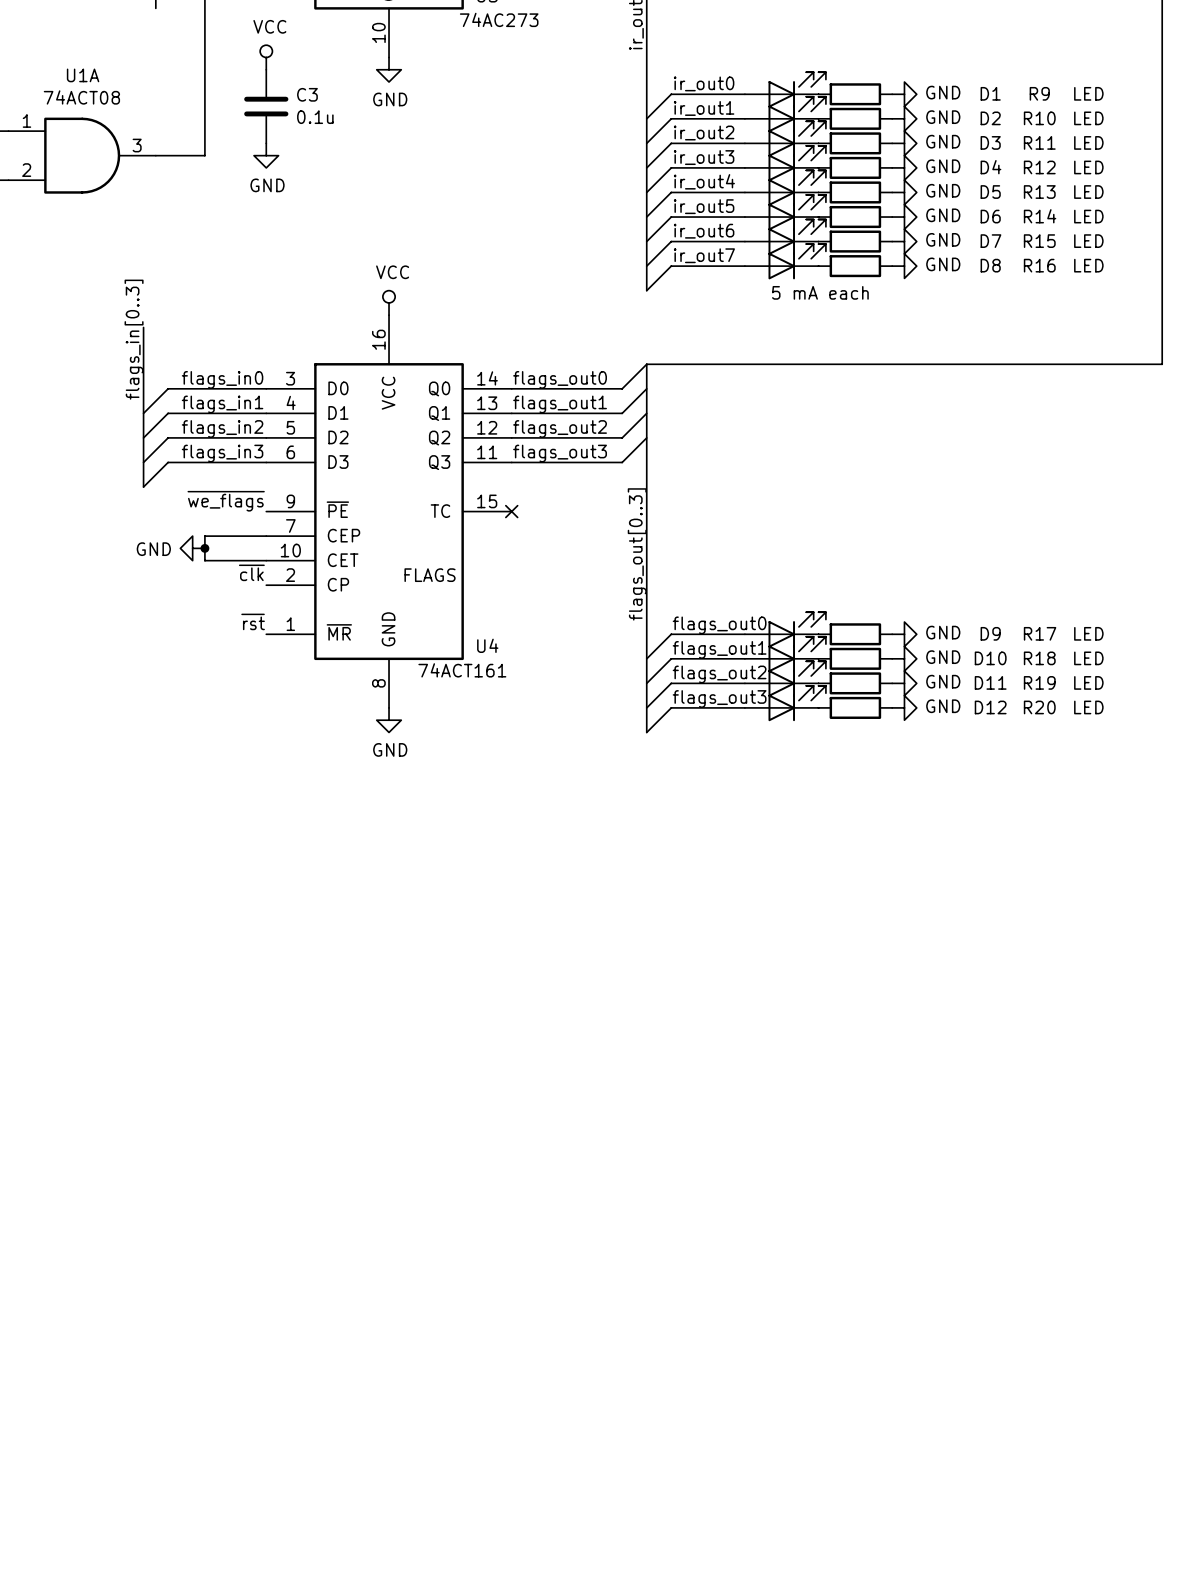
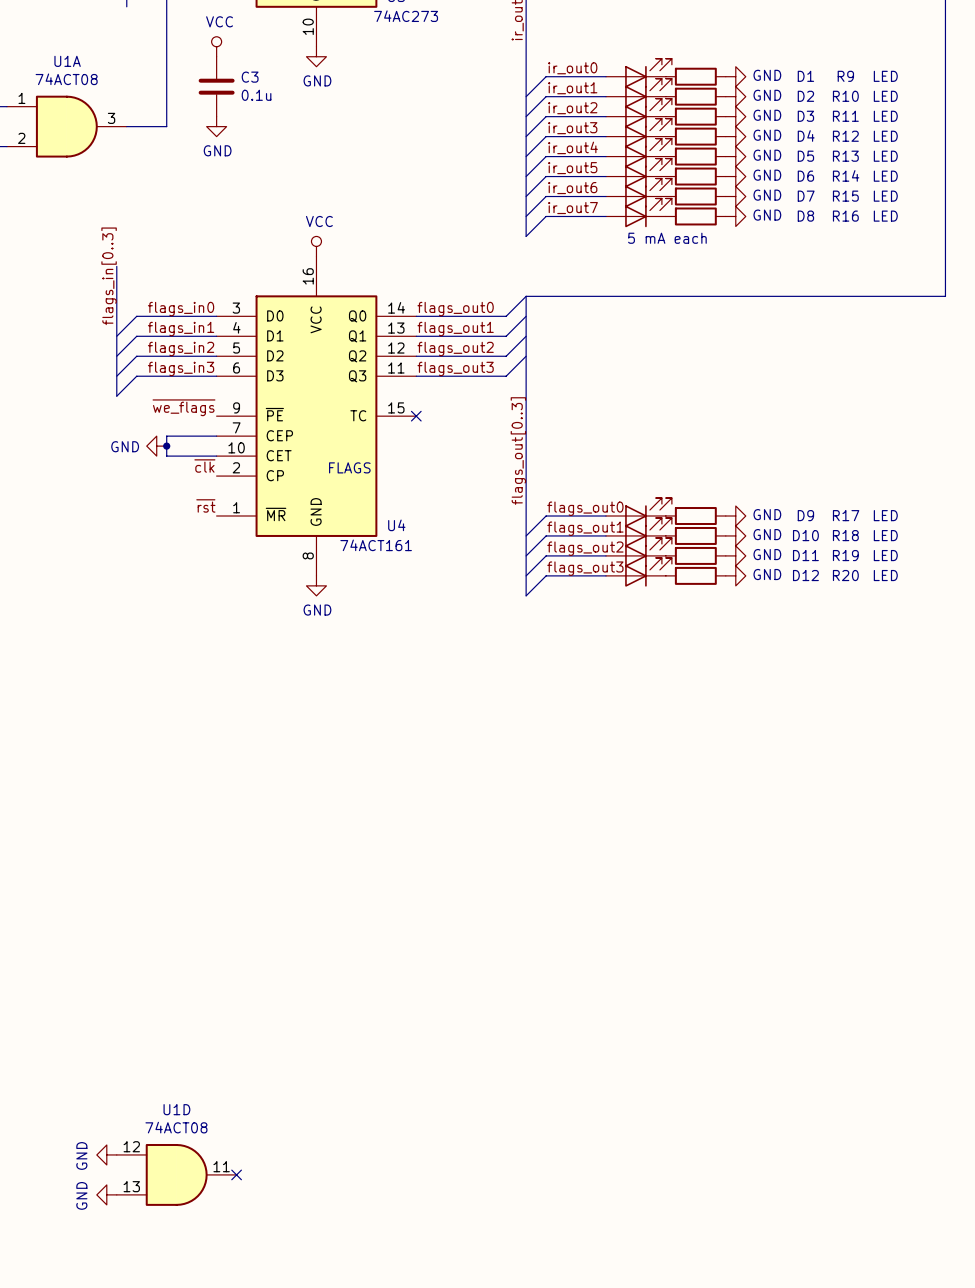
power symbol: none -> GND (106, 1154)
U1D: none -> 74ACT08 (176, 1174)
no-connect mark: none -> (236, 1174)
power symbol: none -> GND (106, 1194)

